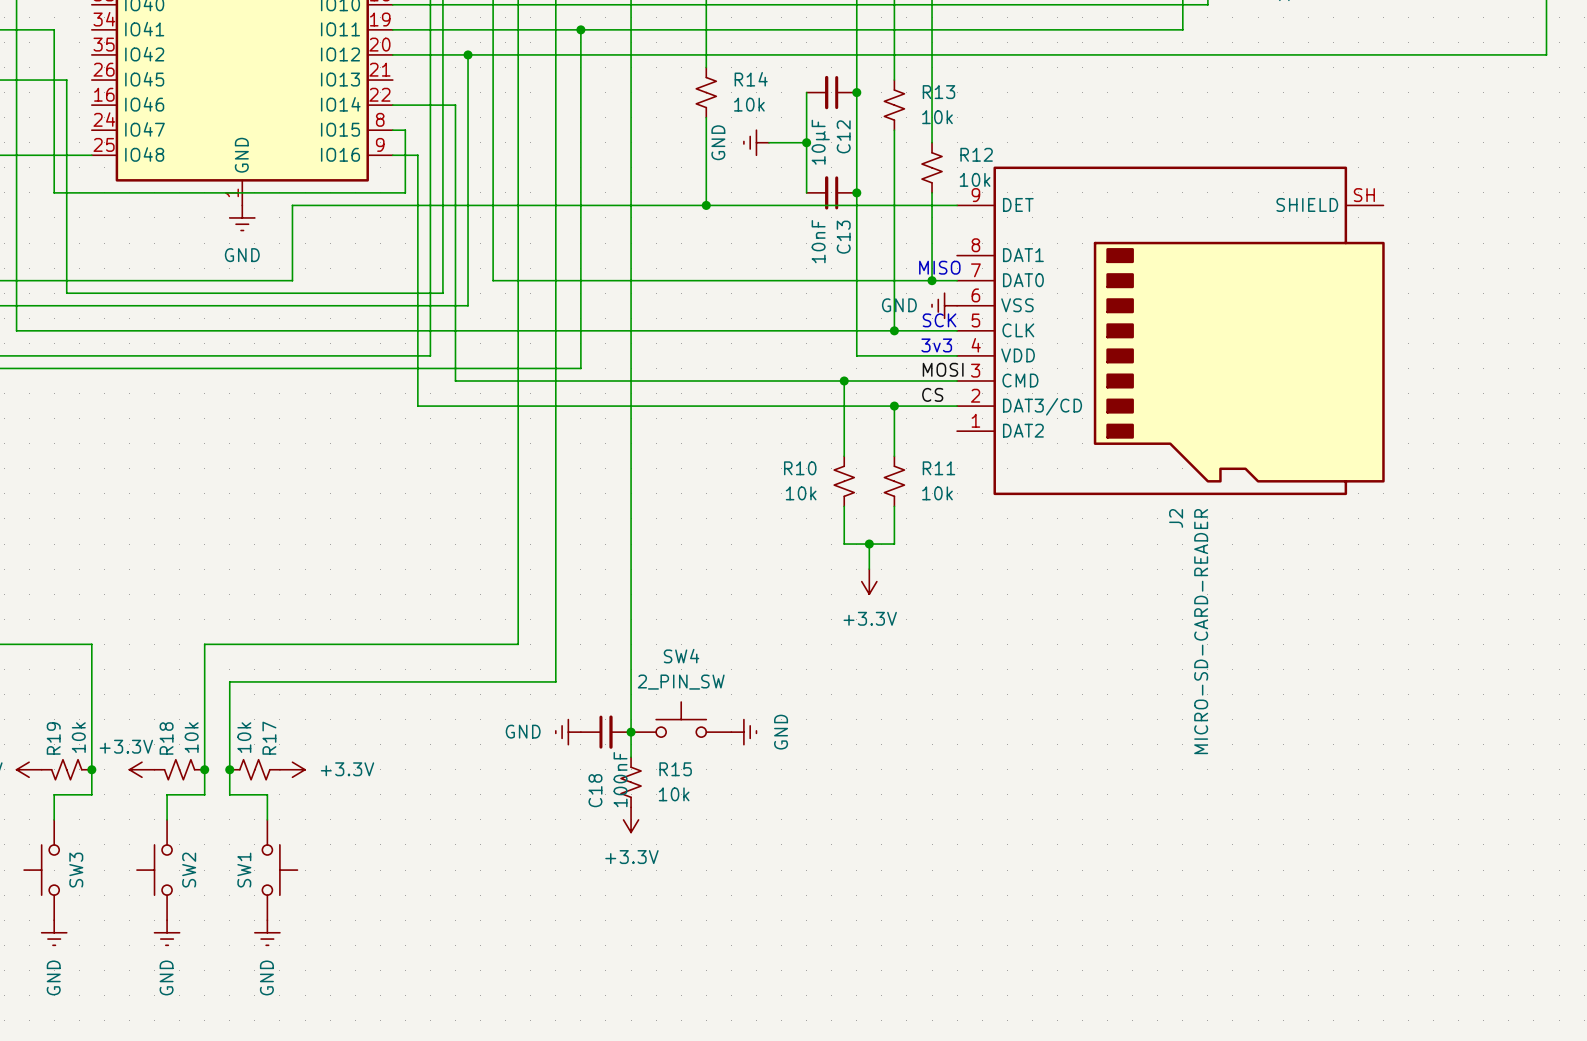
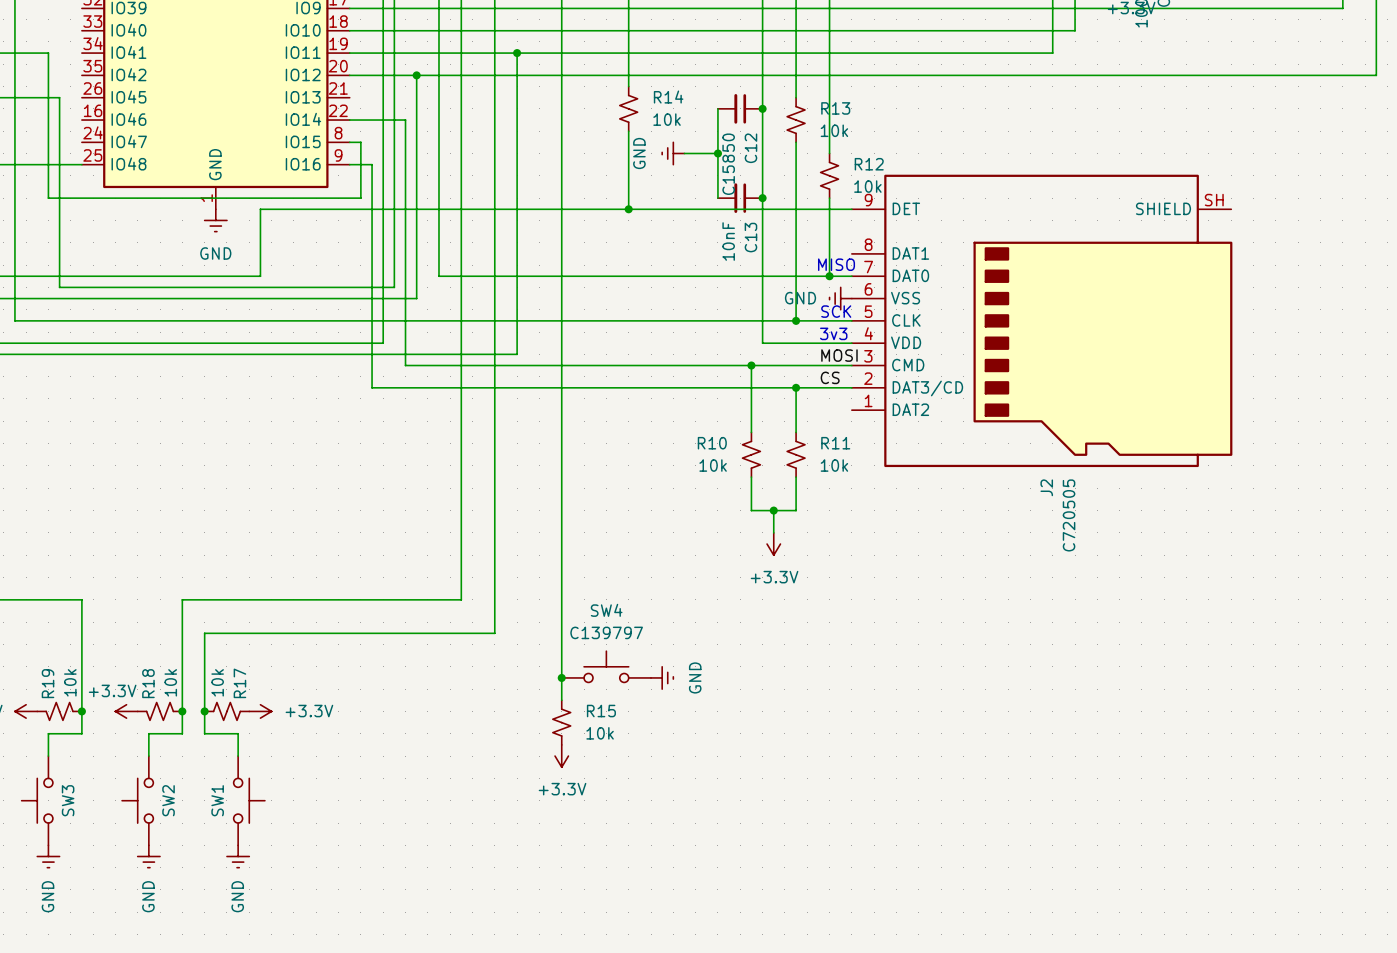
C12 value: 10μF (820, 142) -> C15850 (728, 164)
J2 value: MICRO-SD-CARD-READER (1201, 631) -> C720505 (1069, 515)
SW4 value: 2_PIN_SW (681, 682) -> C139797 (606, 632)
power symbol: GND (568, 732) -> none
C18: 100nF (605, 732) -> none

